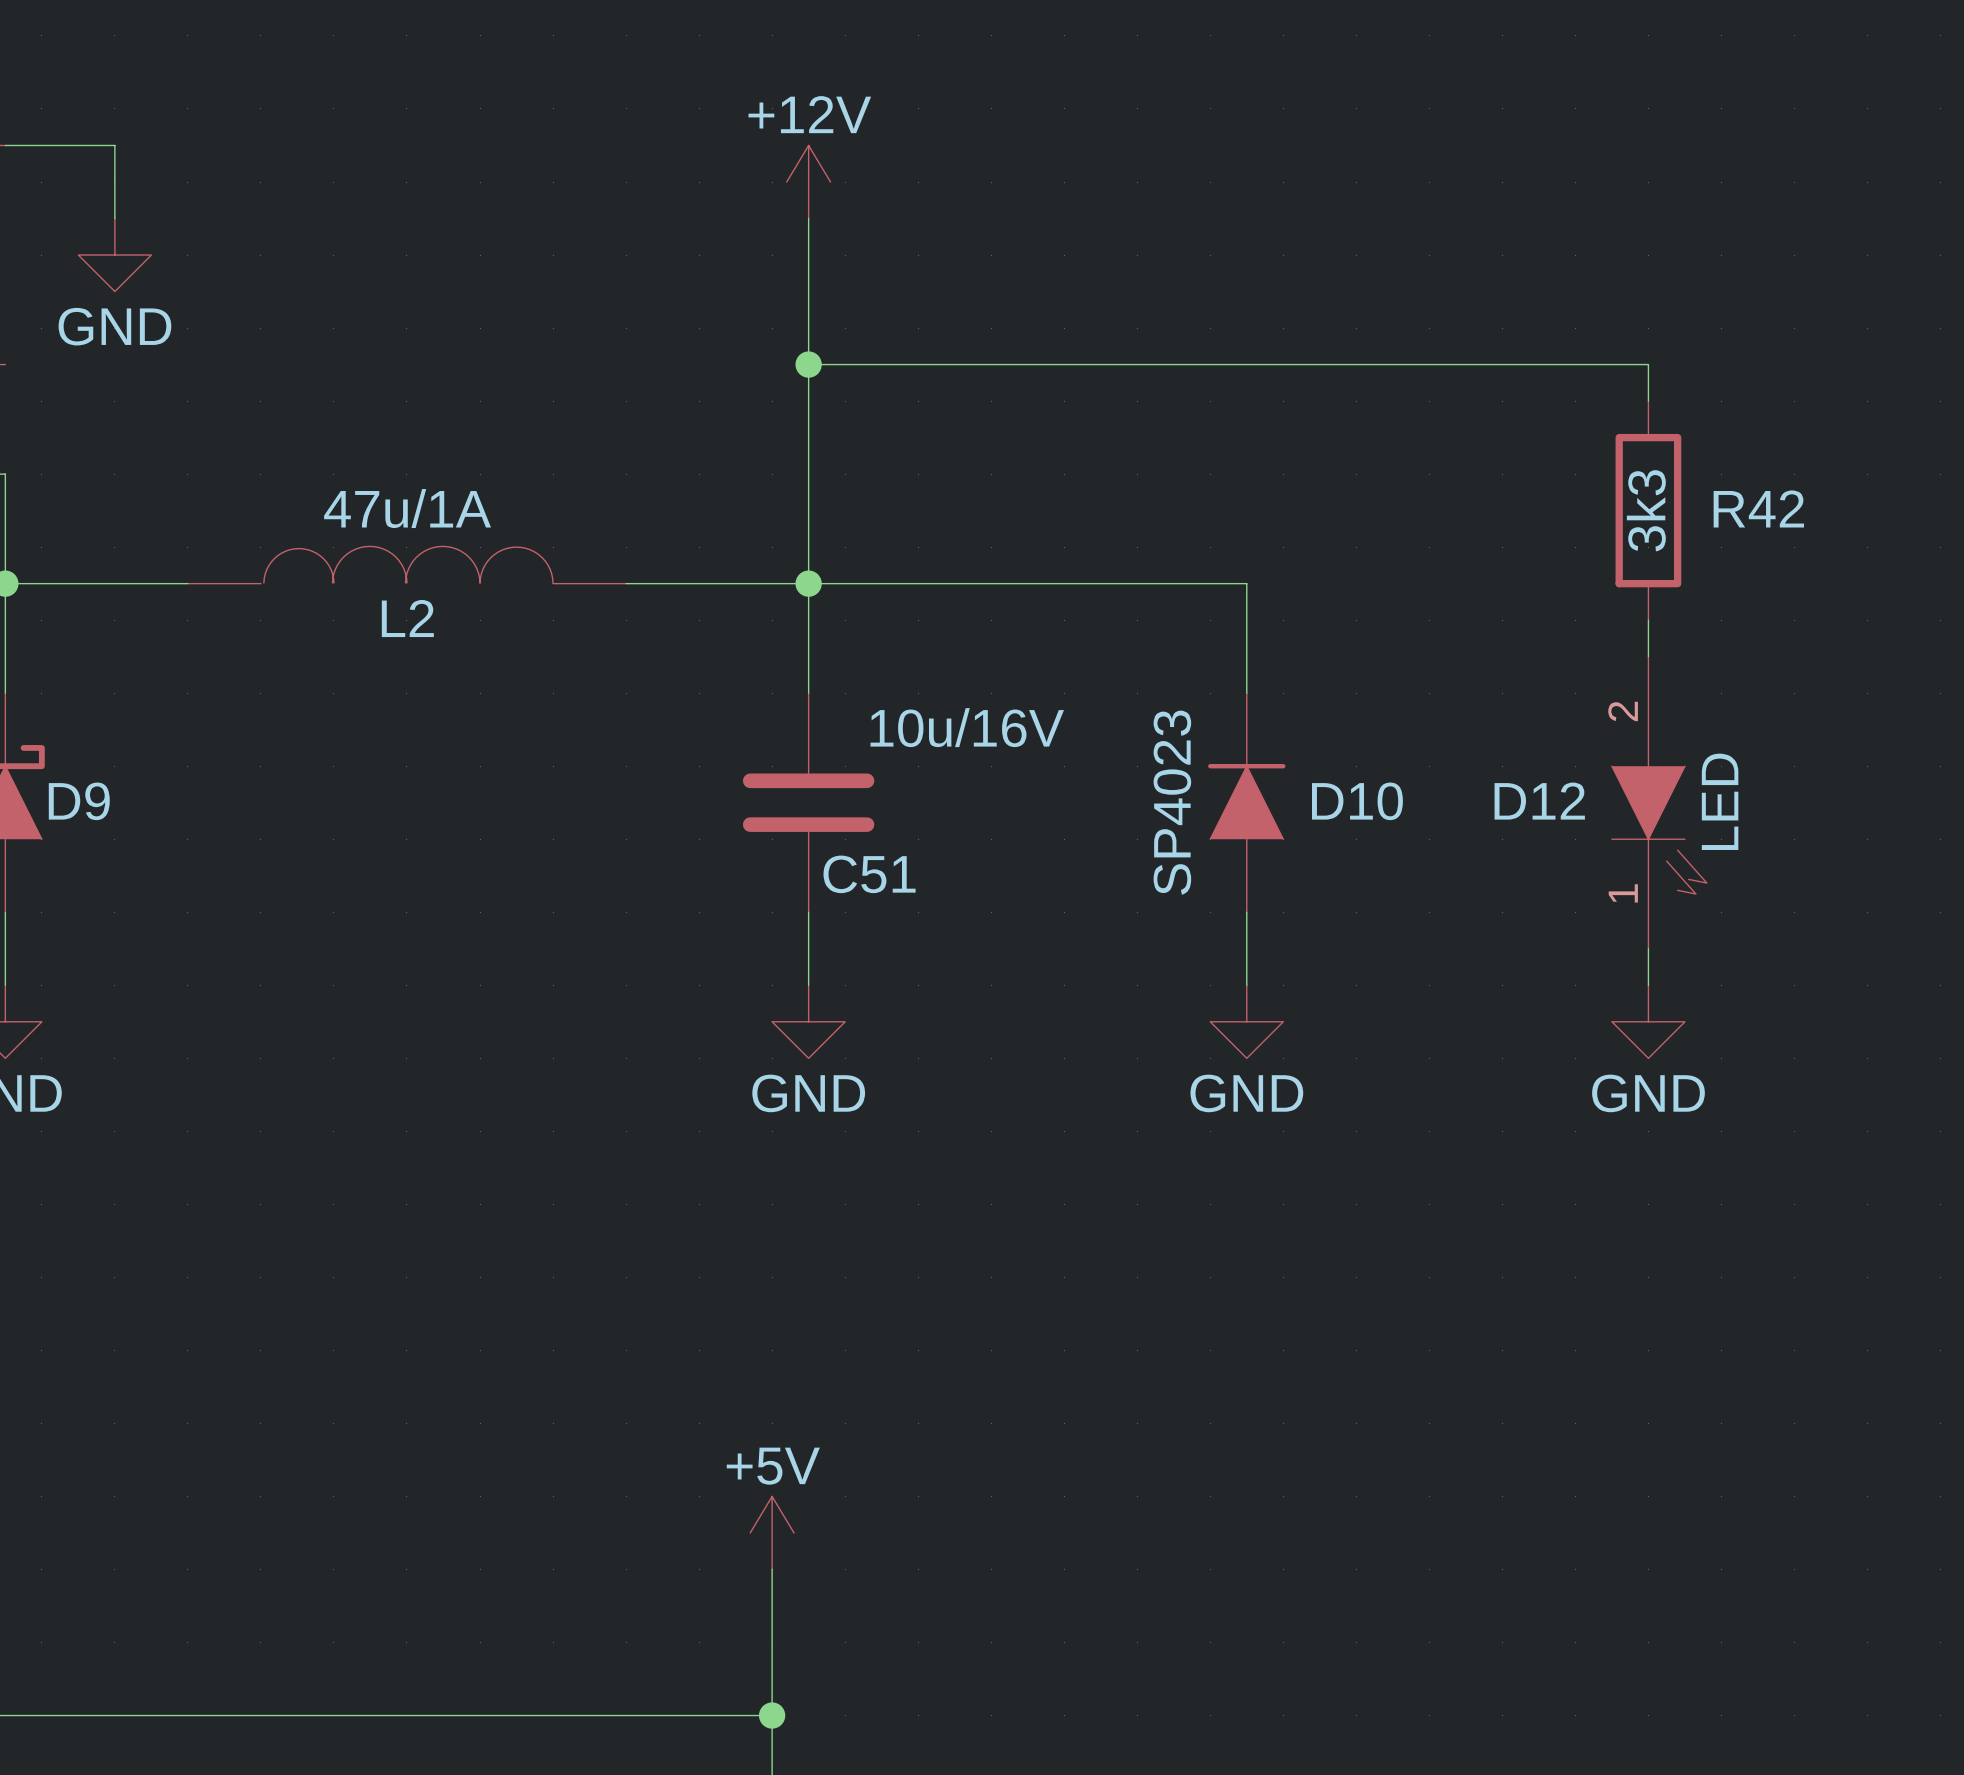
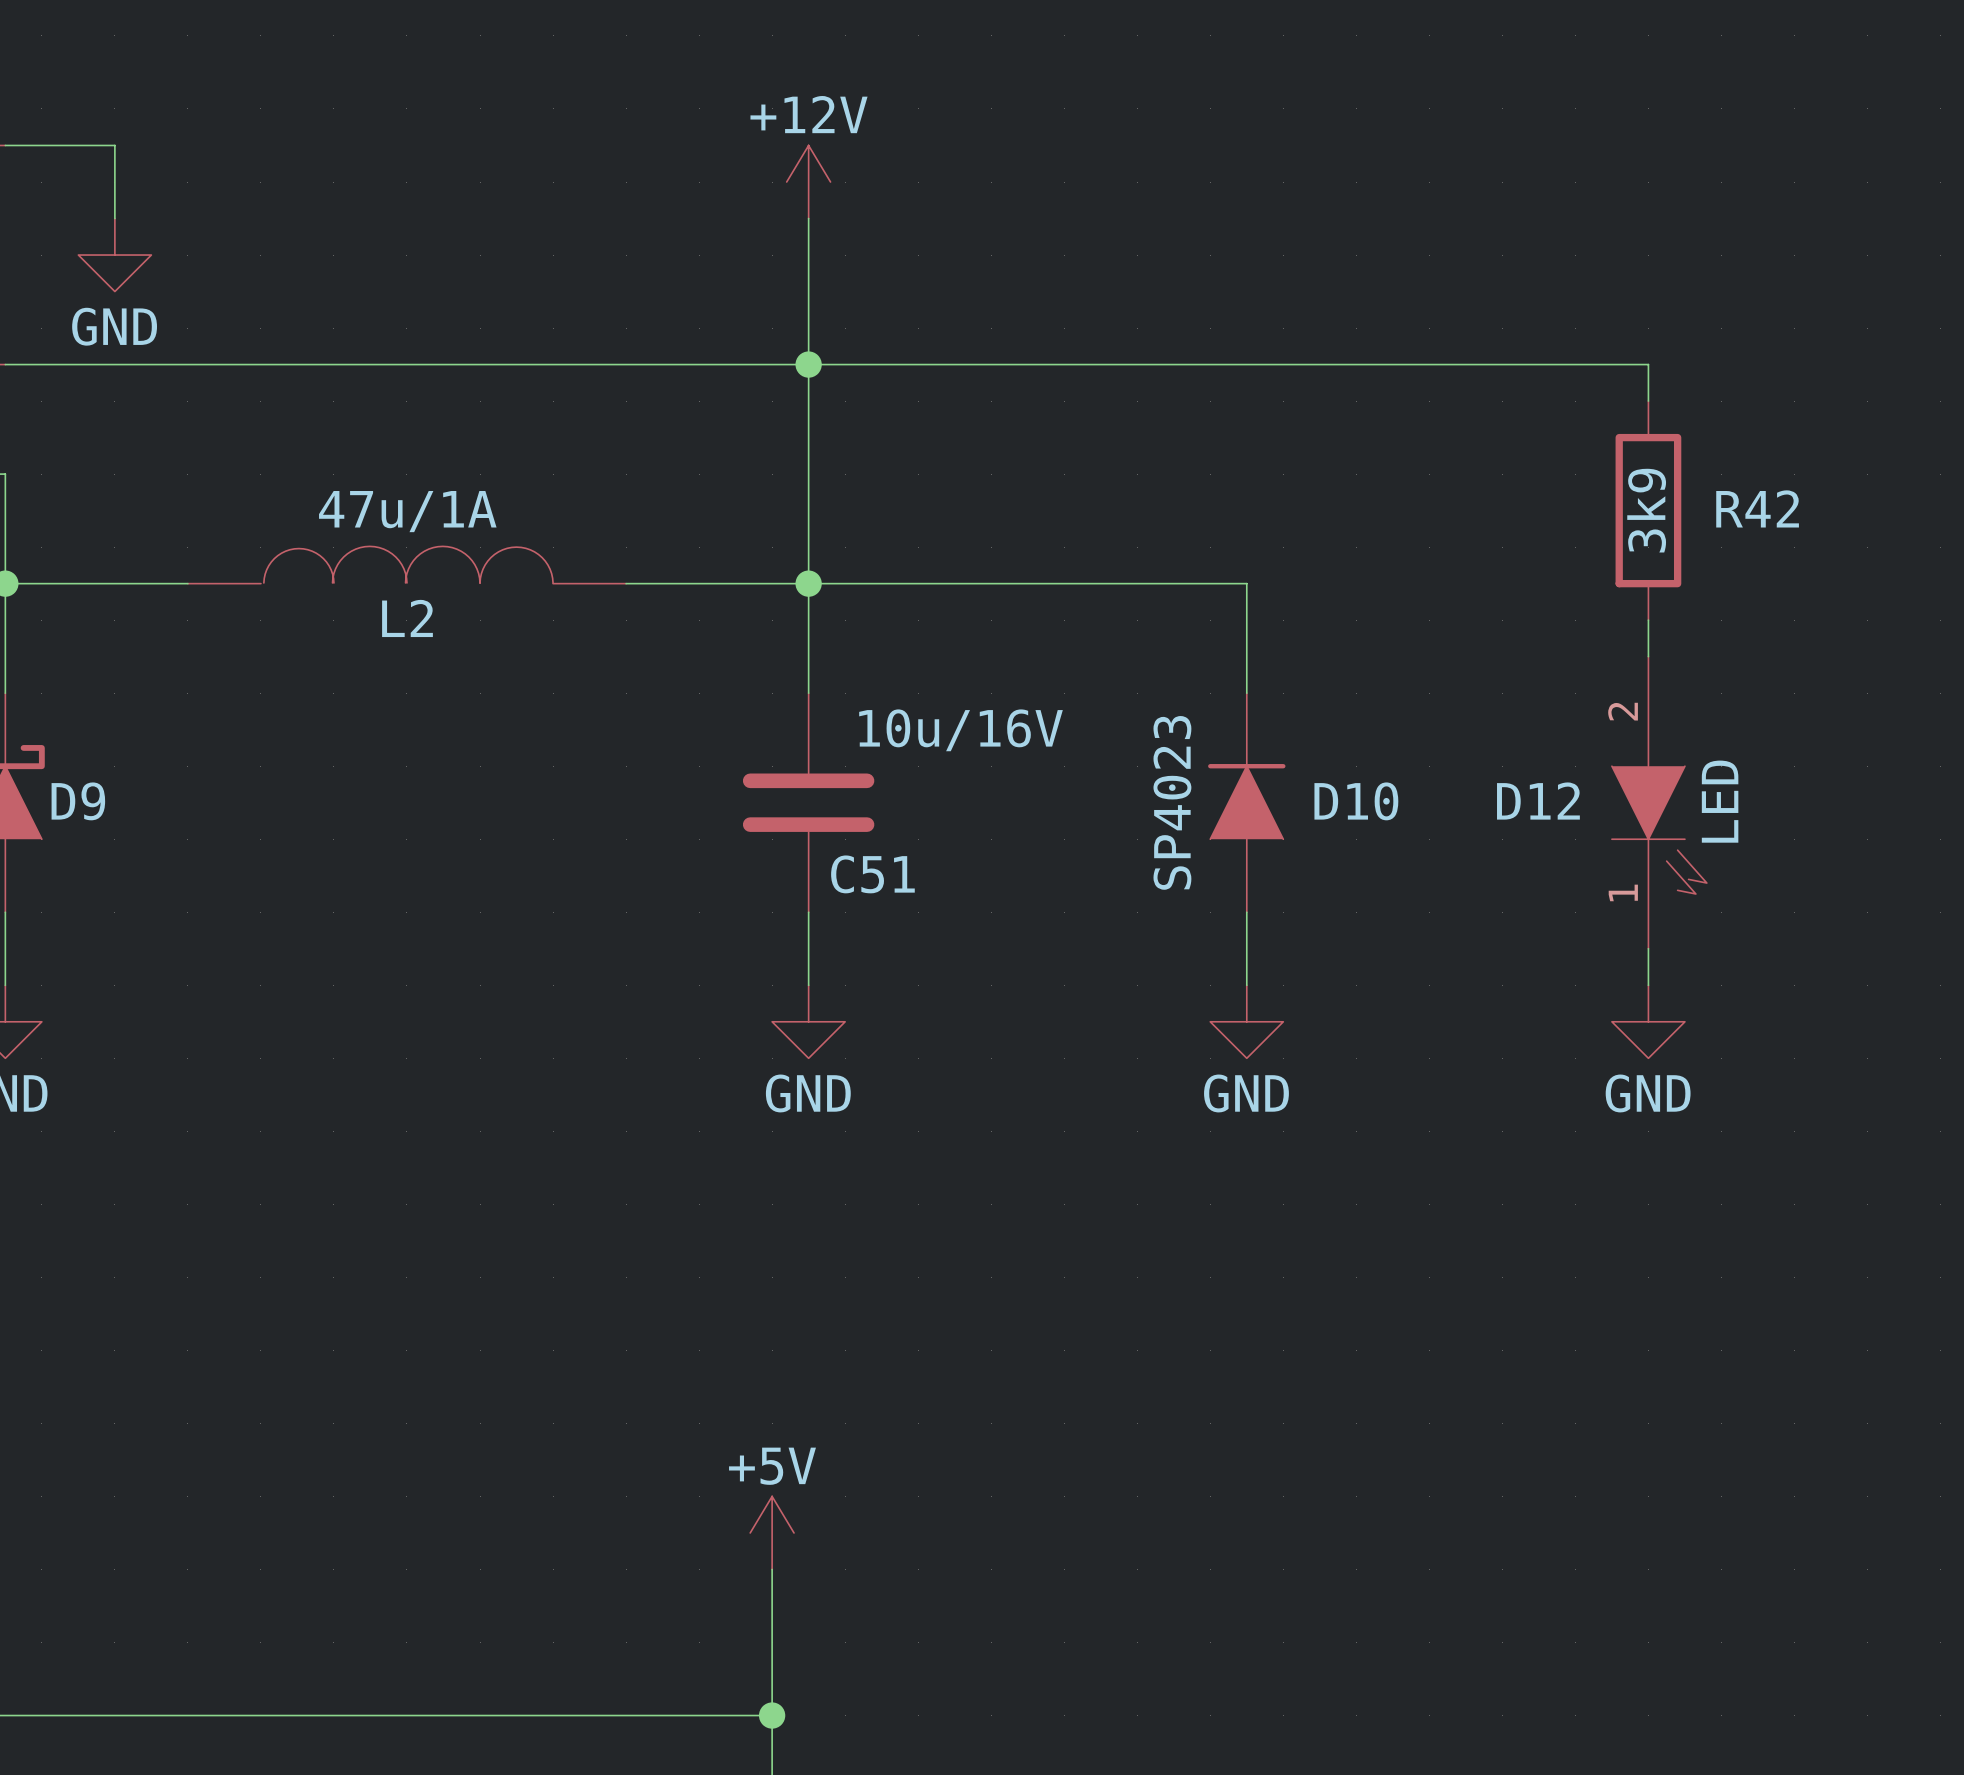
wire: none -> (5, 364) (808, 364)
R42 value: 3k3 (1646, 510) -> 3k9 (1646, 510)

